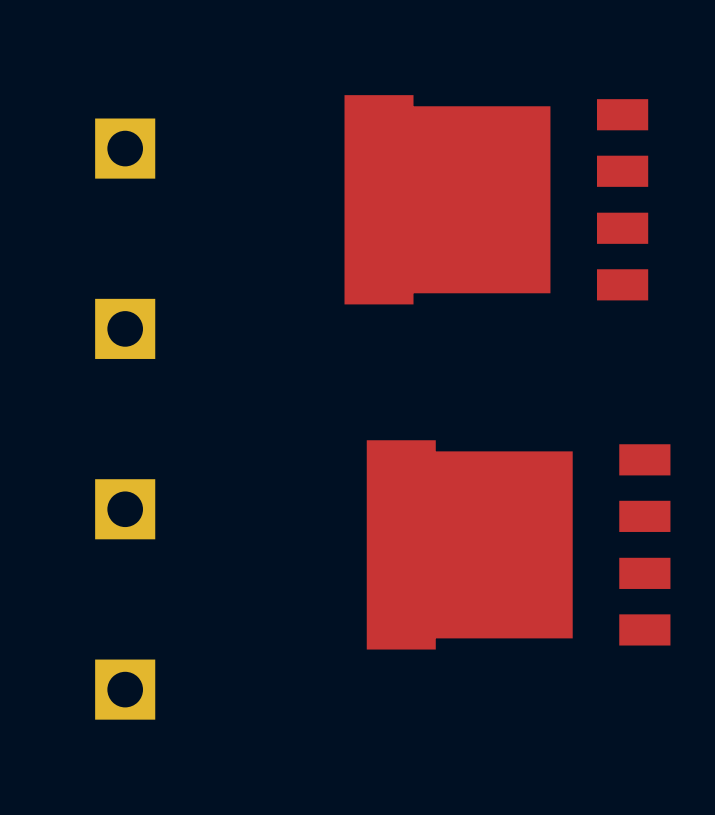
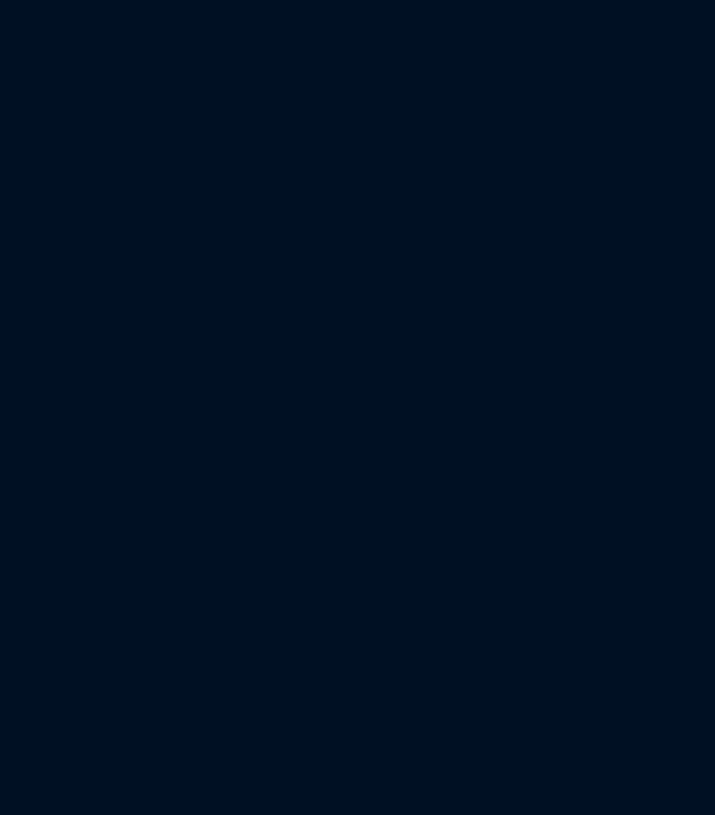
part: (125, 148) -> none
part: (496, 199) -> none
part: (125, 328) -> none
part: (125, 509) -> none
part: (518, 544) -> none
part: (125, 689) -> none

